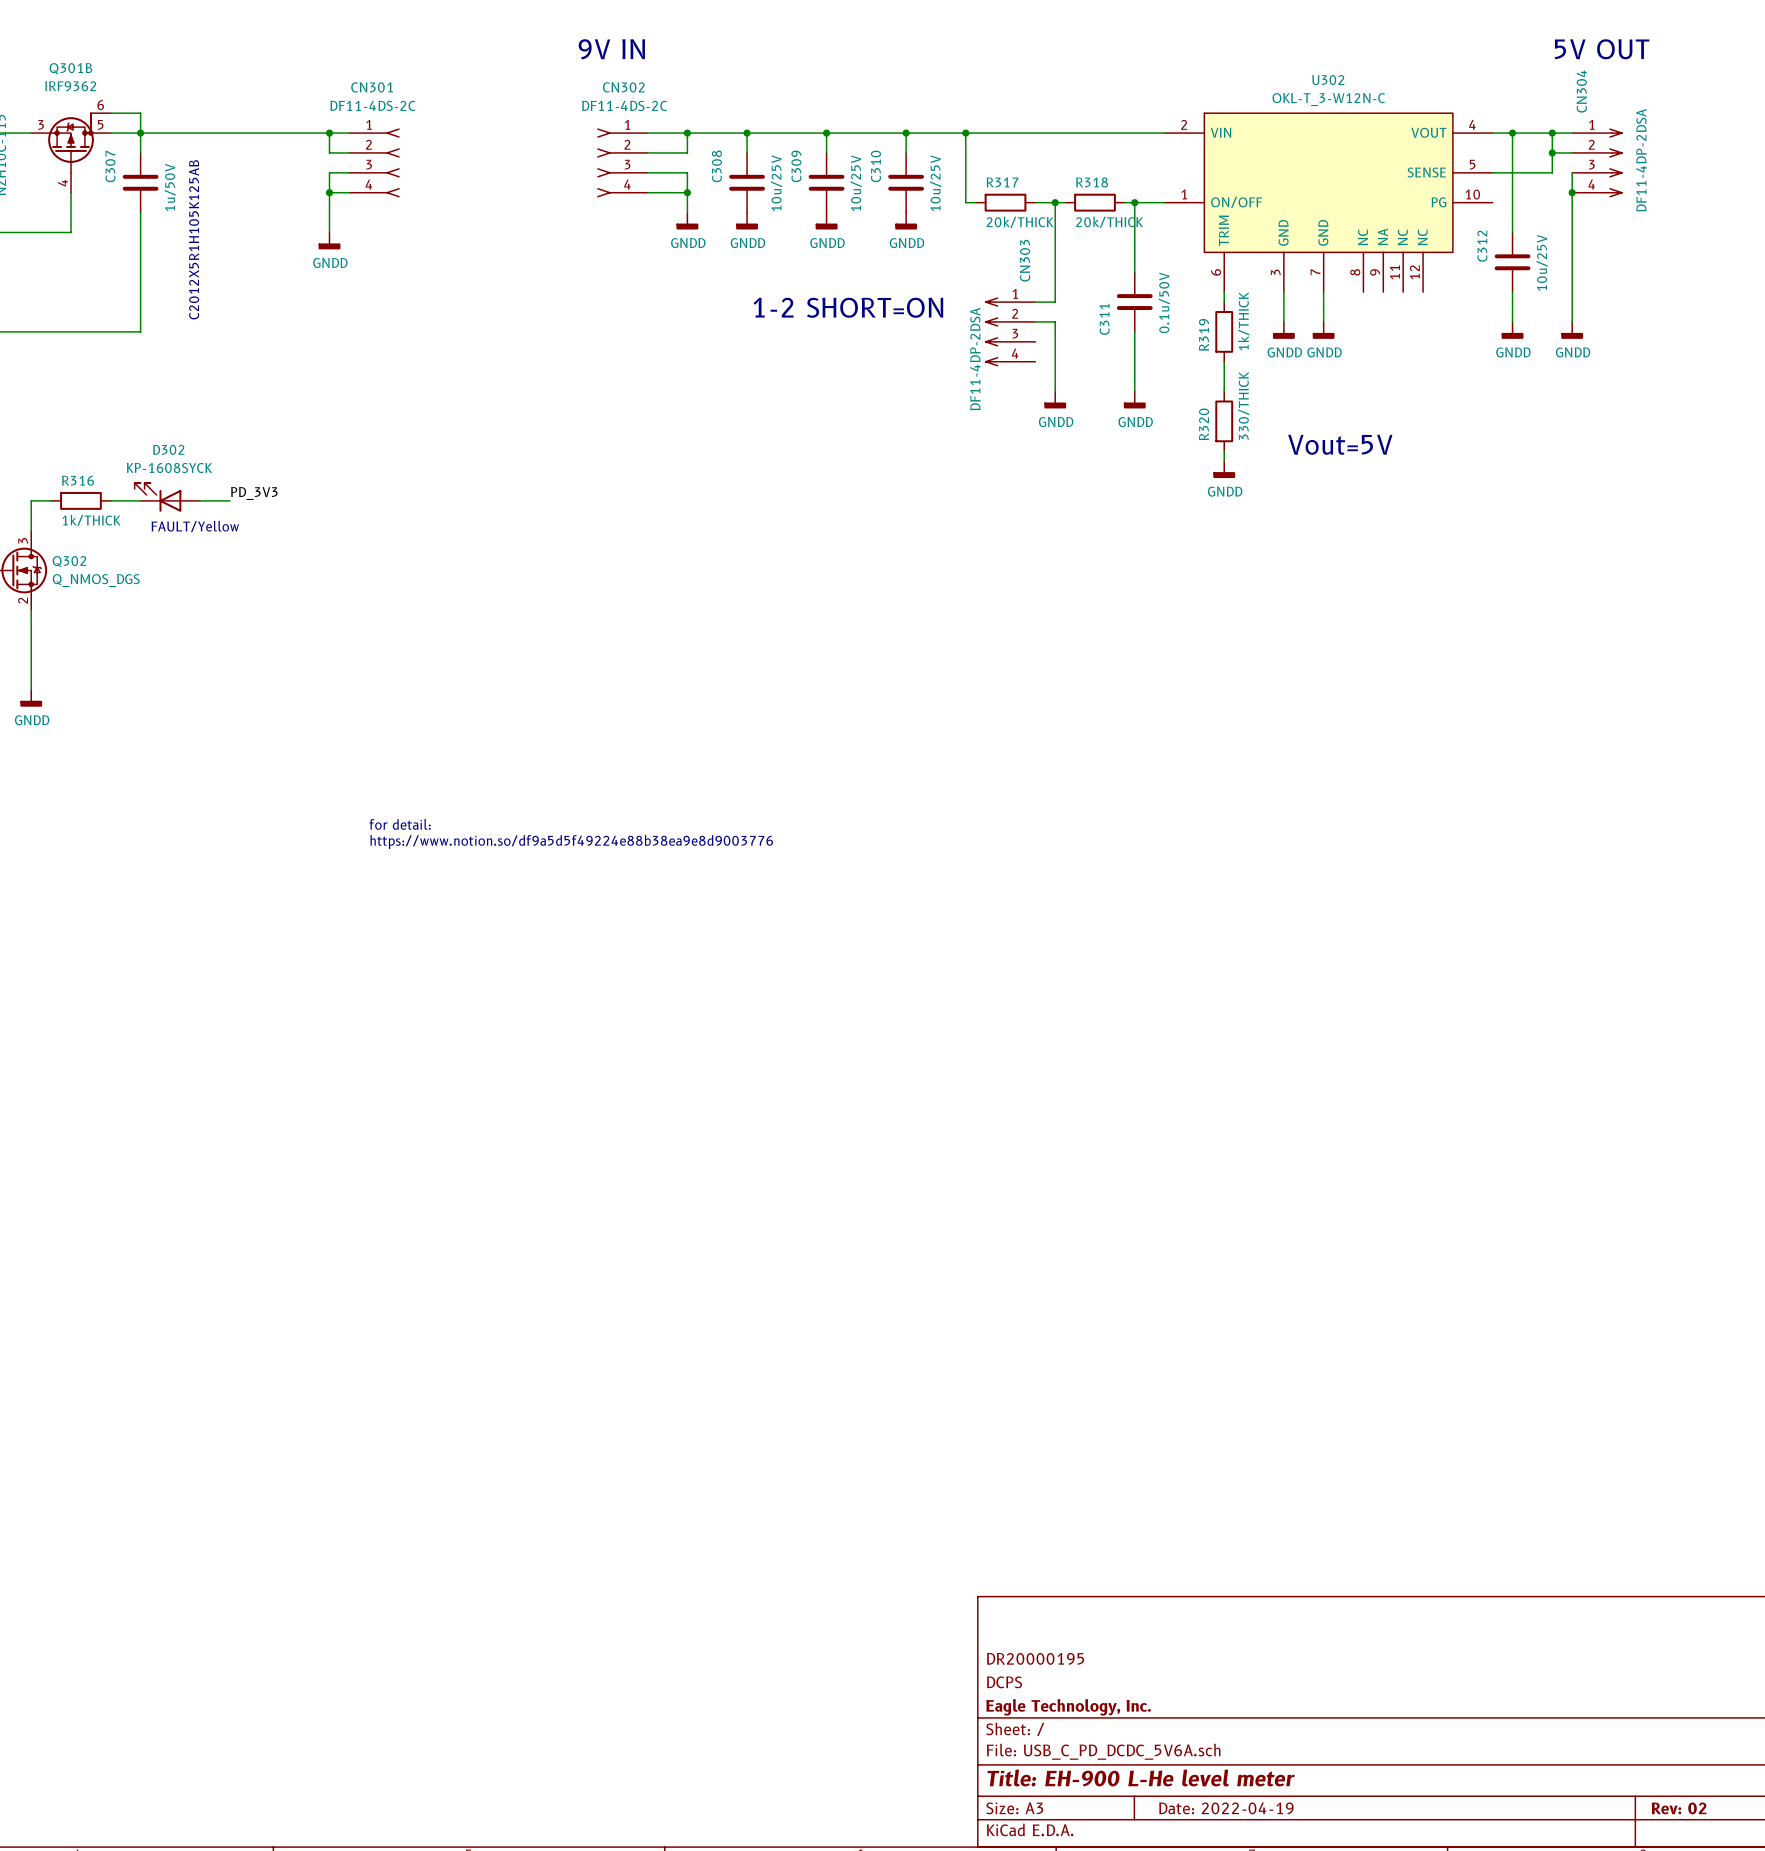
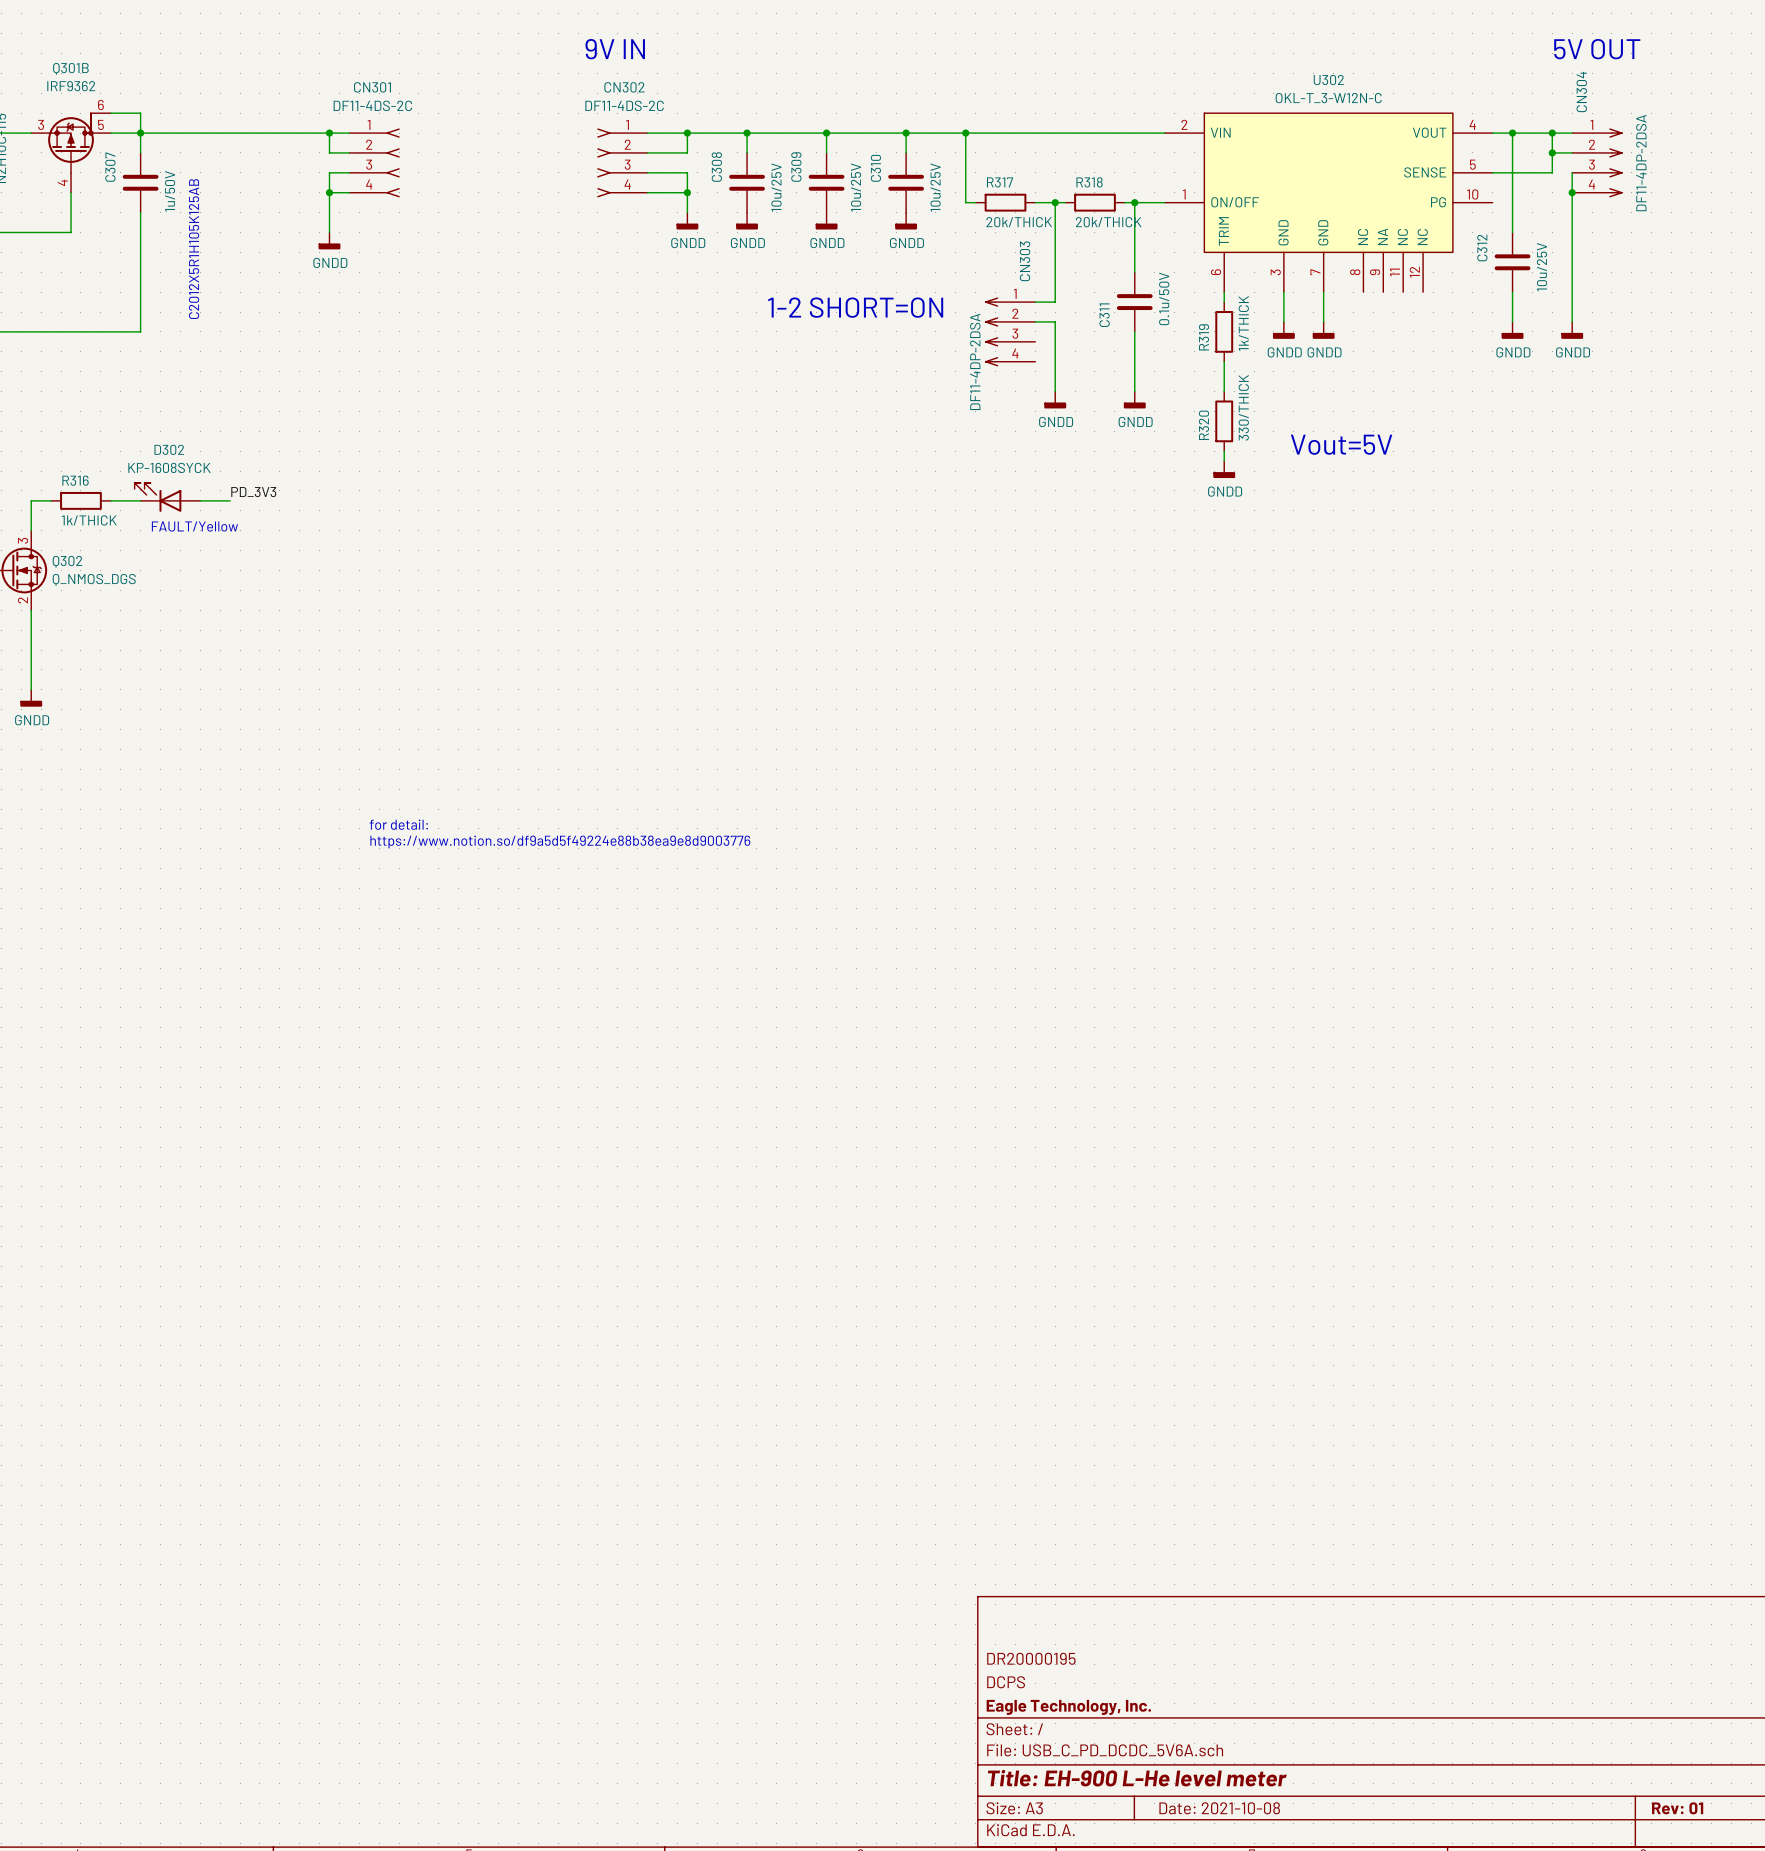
title block: Date: 2022-04-19 (1226, 1808) -> Date: 2021-10-08 (1219, 1808)
title block: Rev: 02 (1679, 1808) -> Rev: 01 (1677, 1808)

